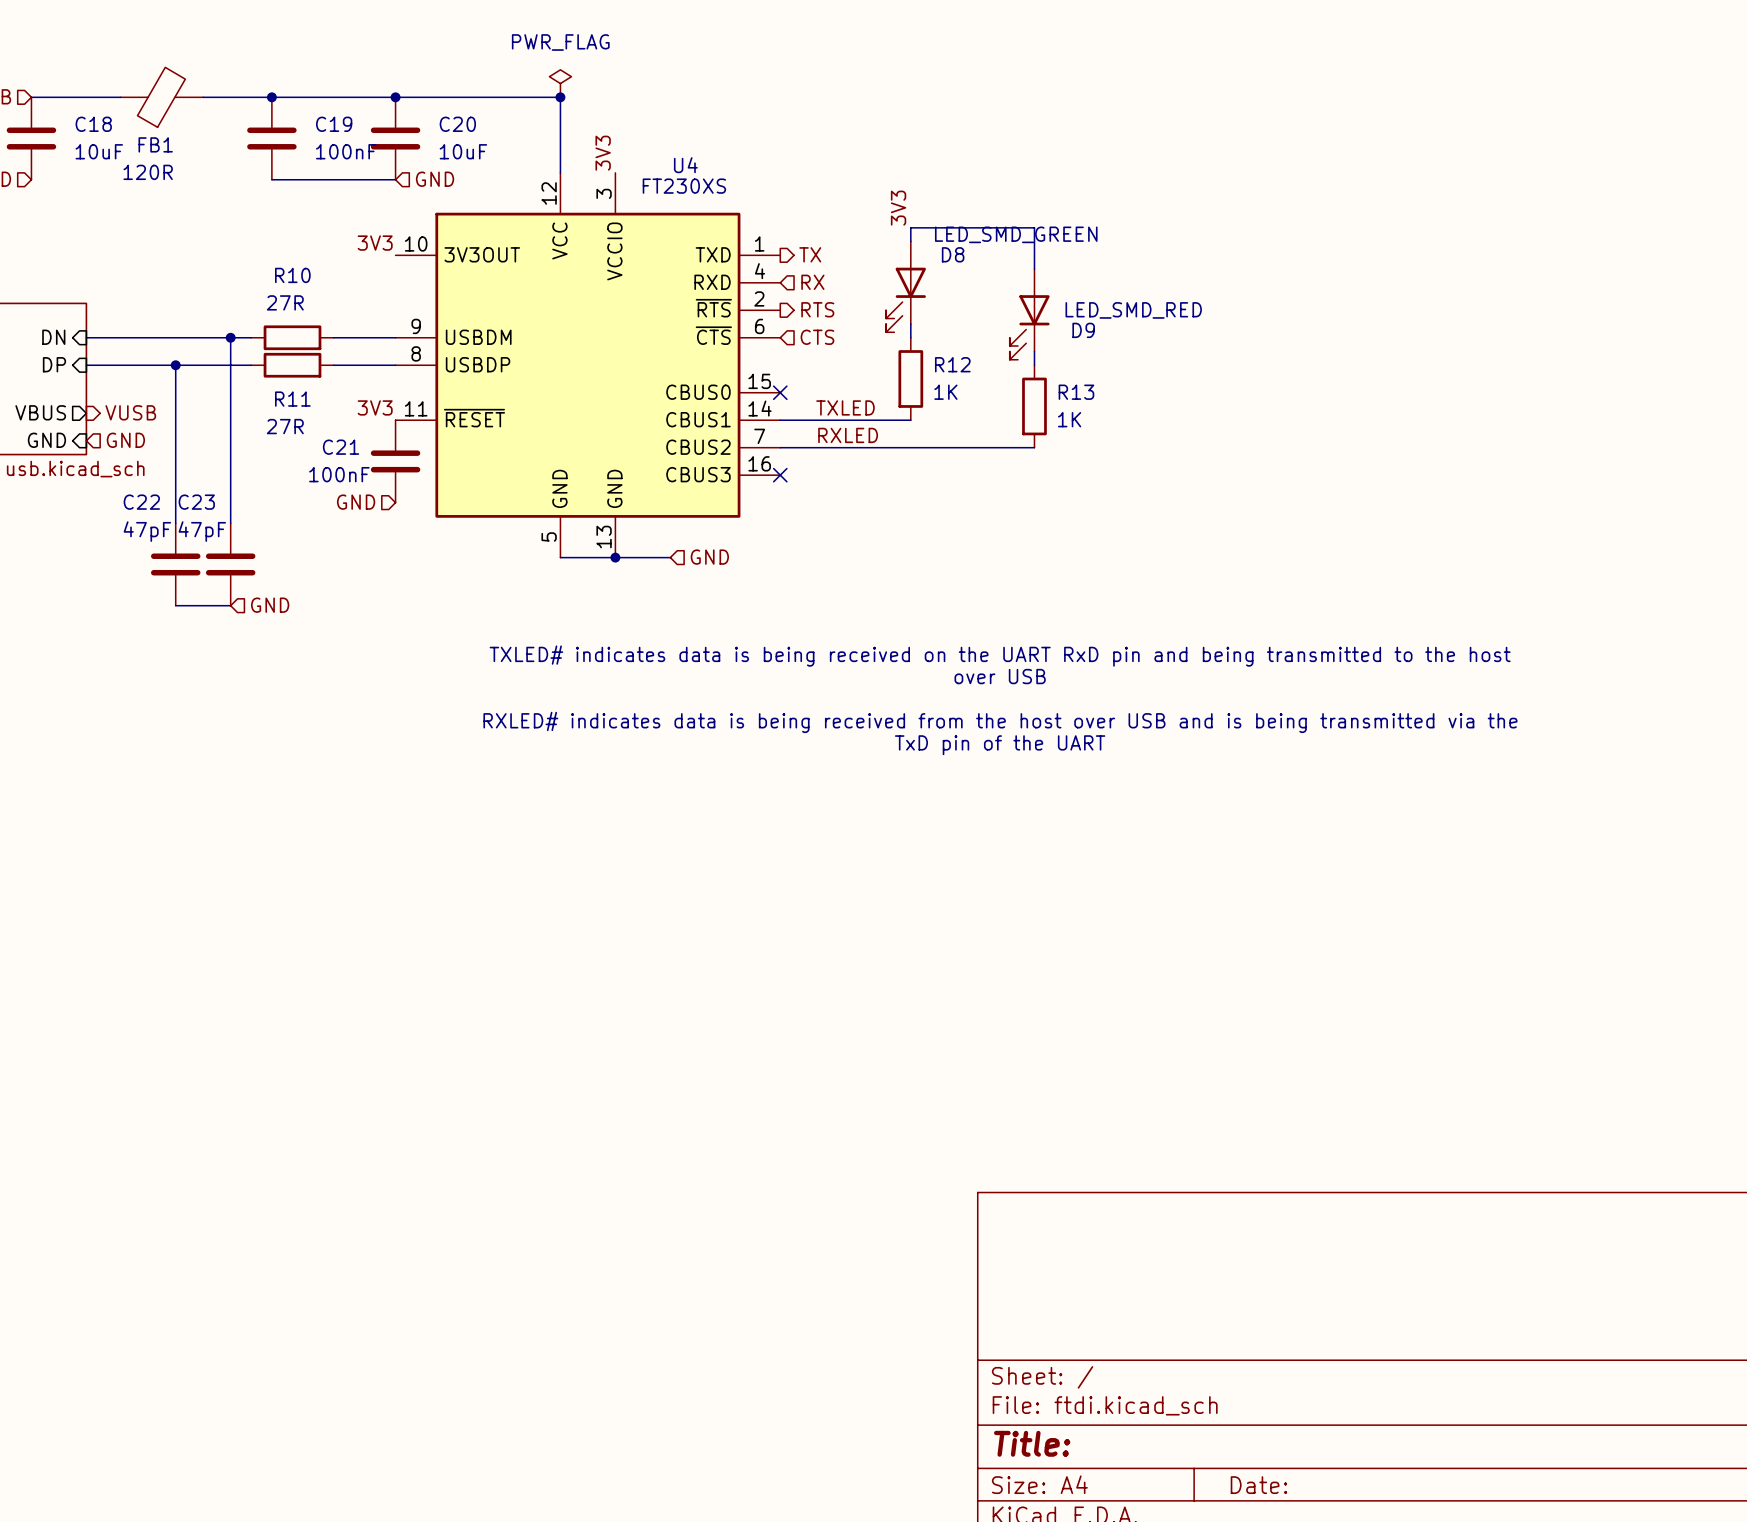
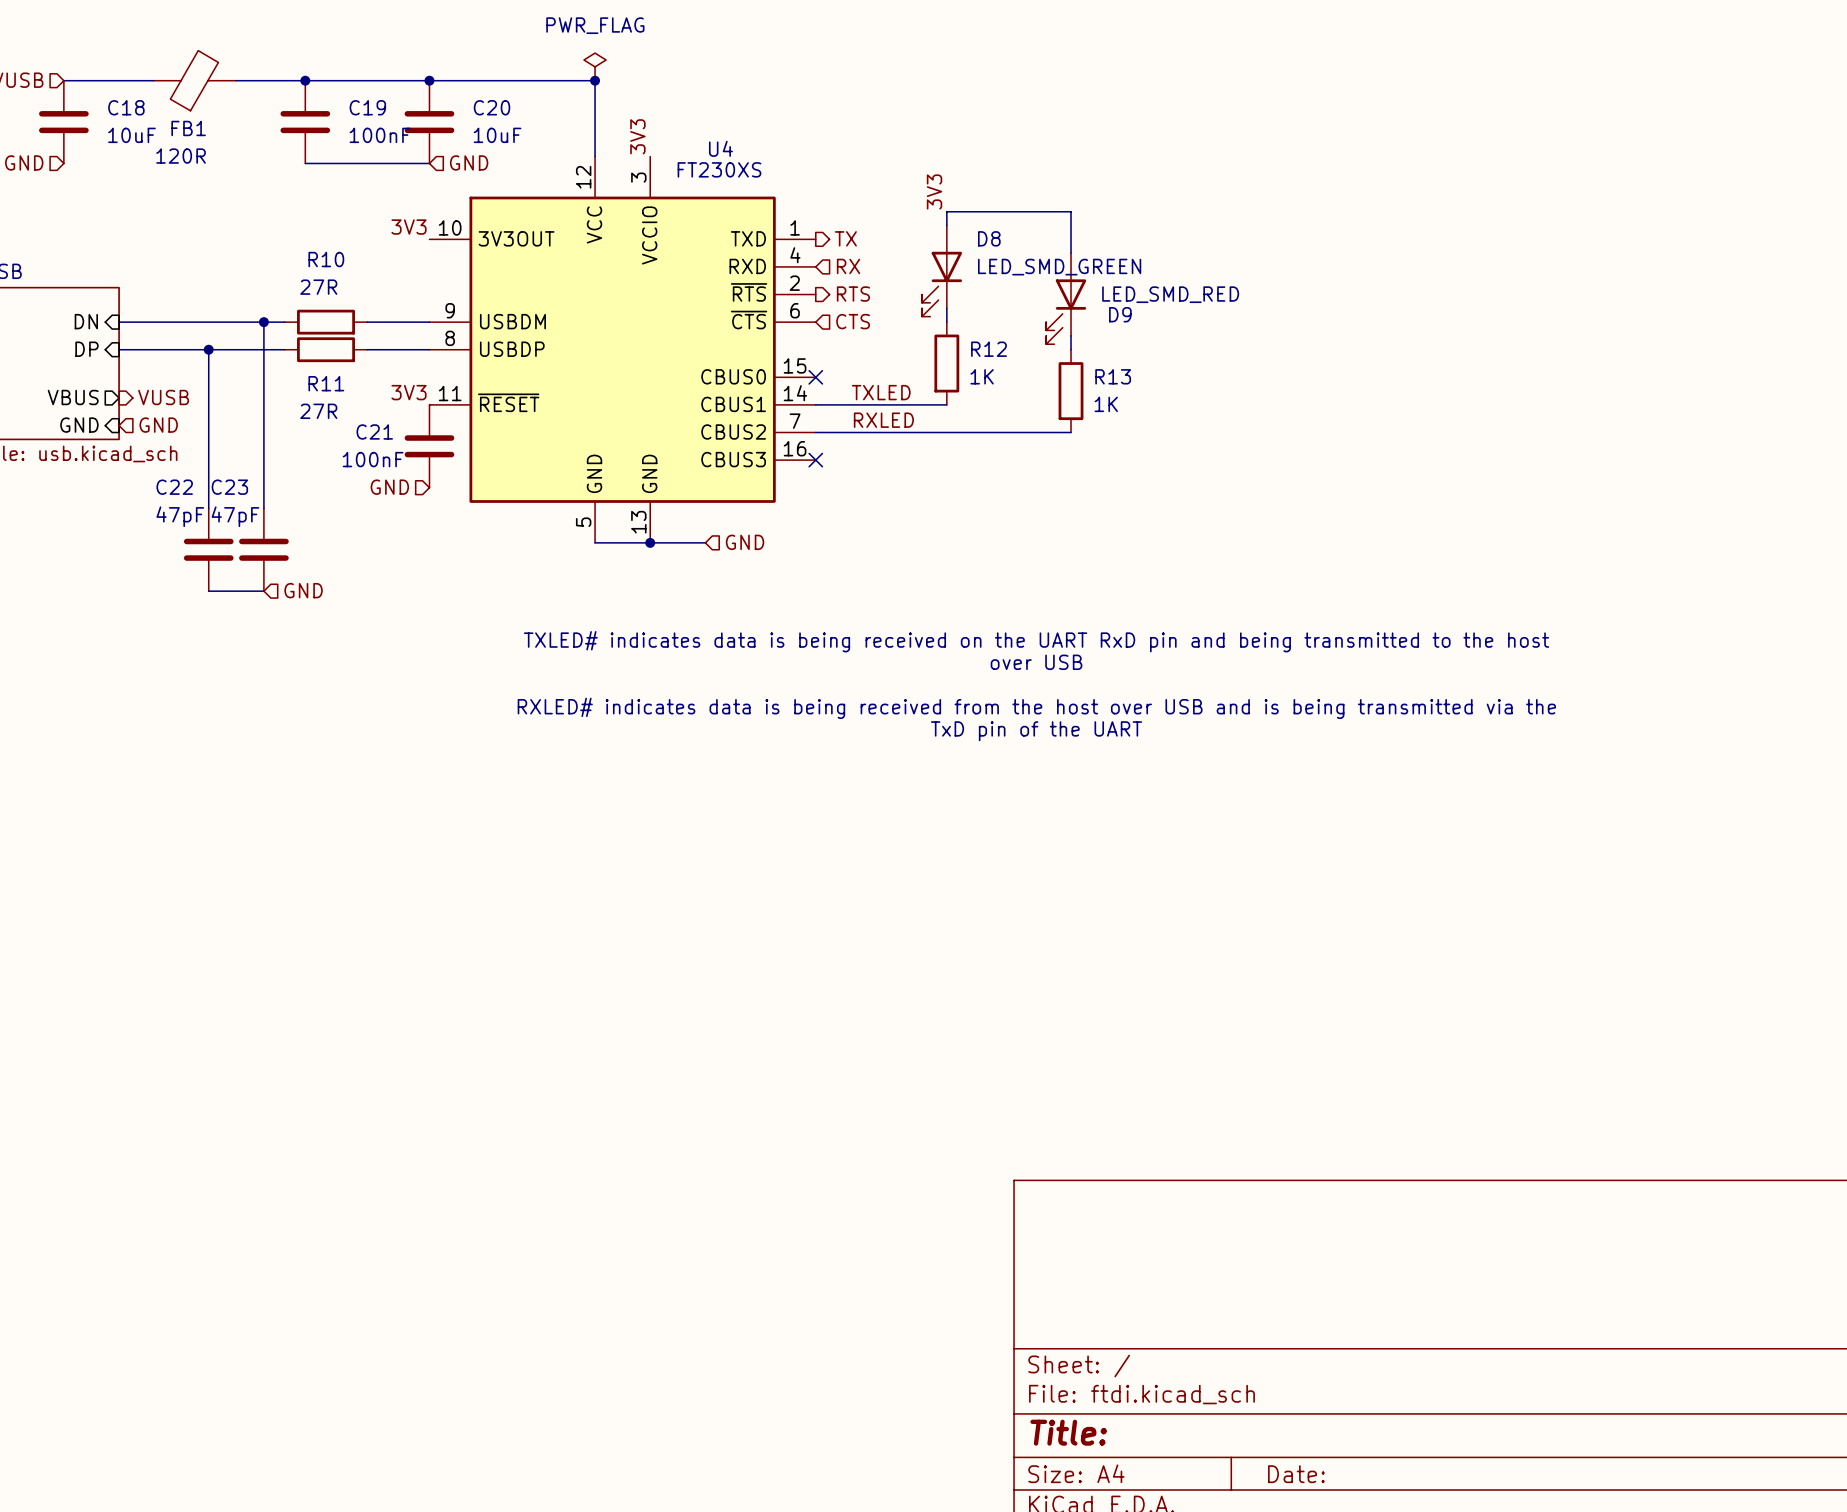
D8 value position: LED_SMD_GREEN (1016, 234) -> LED_SMD_GREEN (1059, 267)

